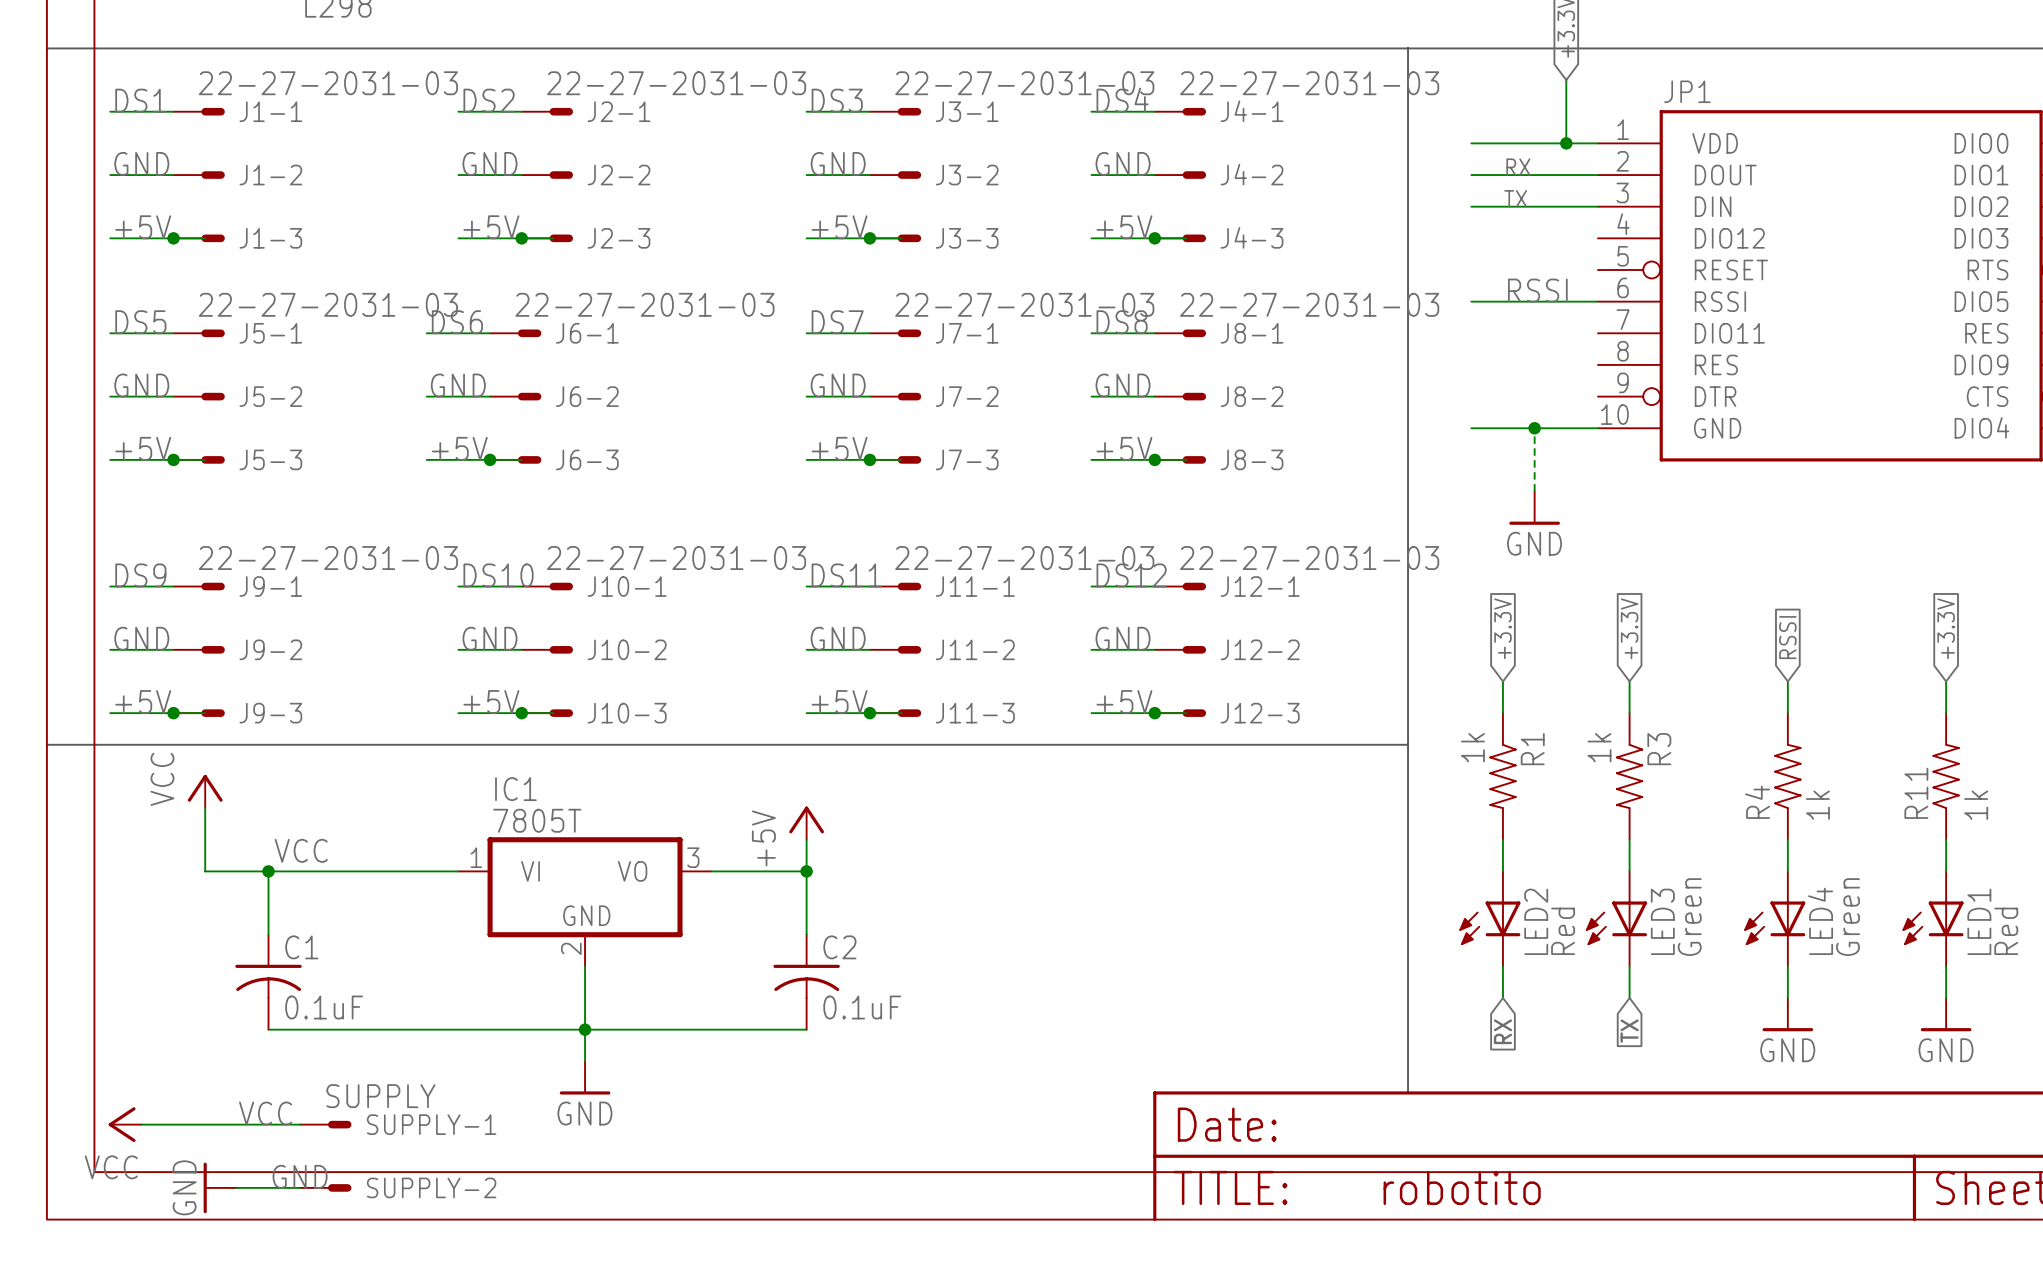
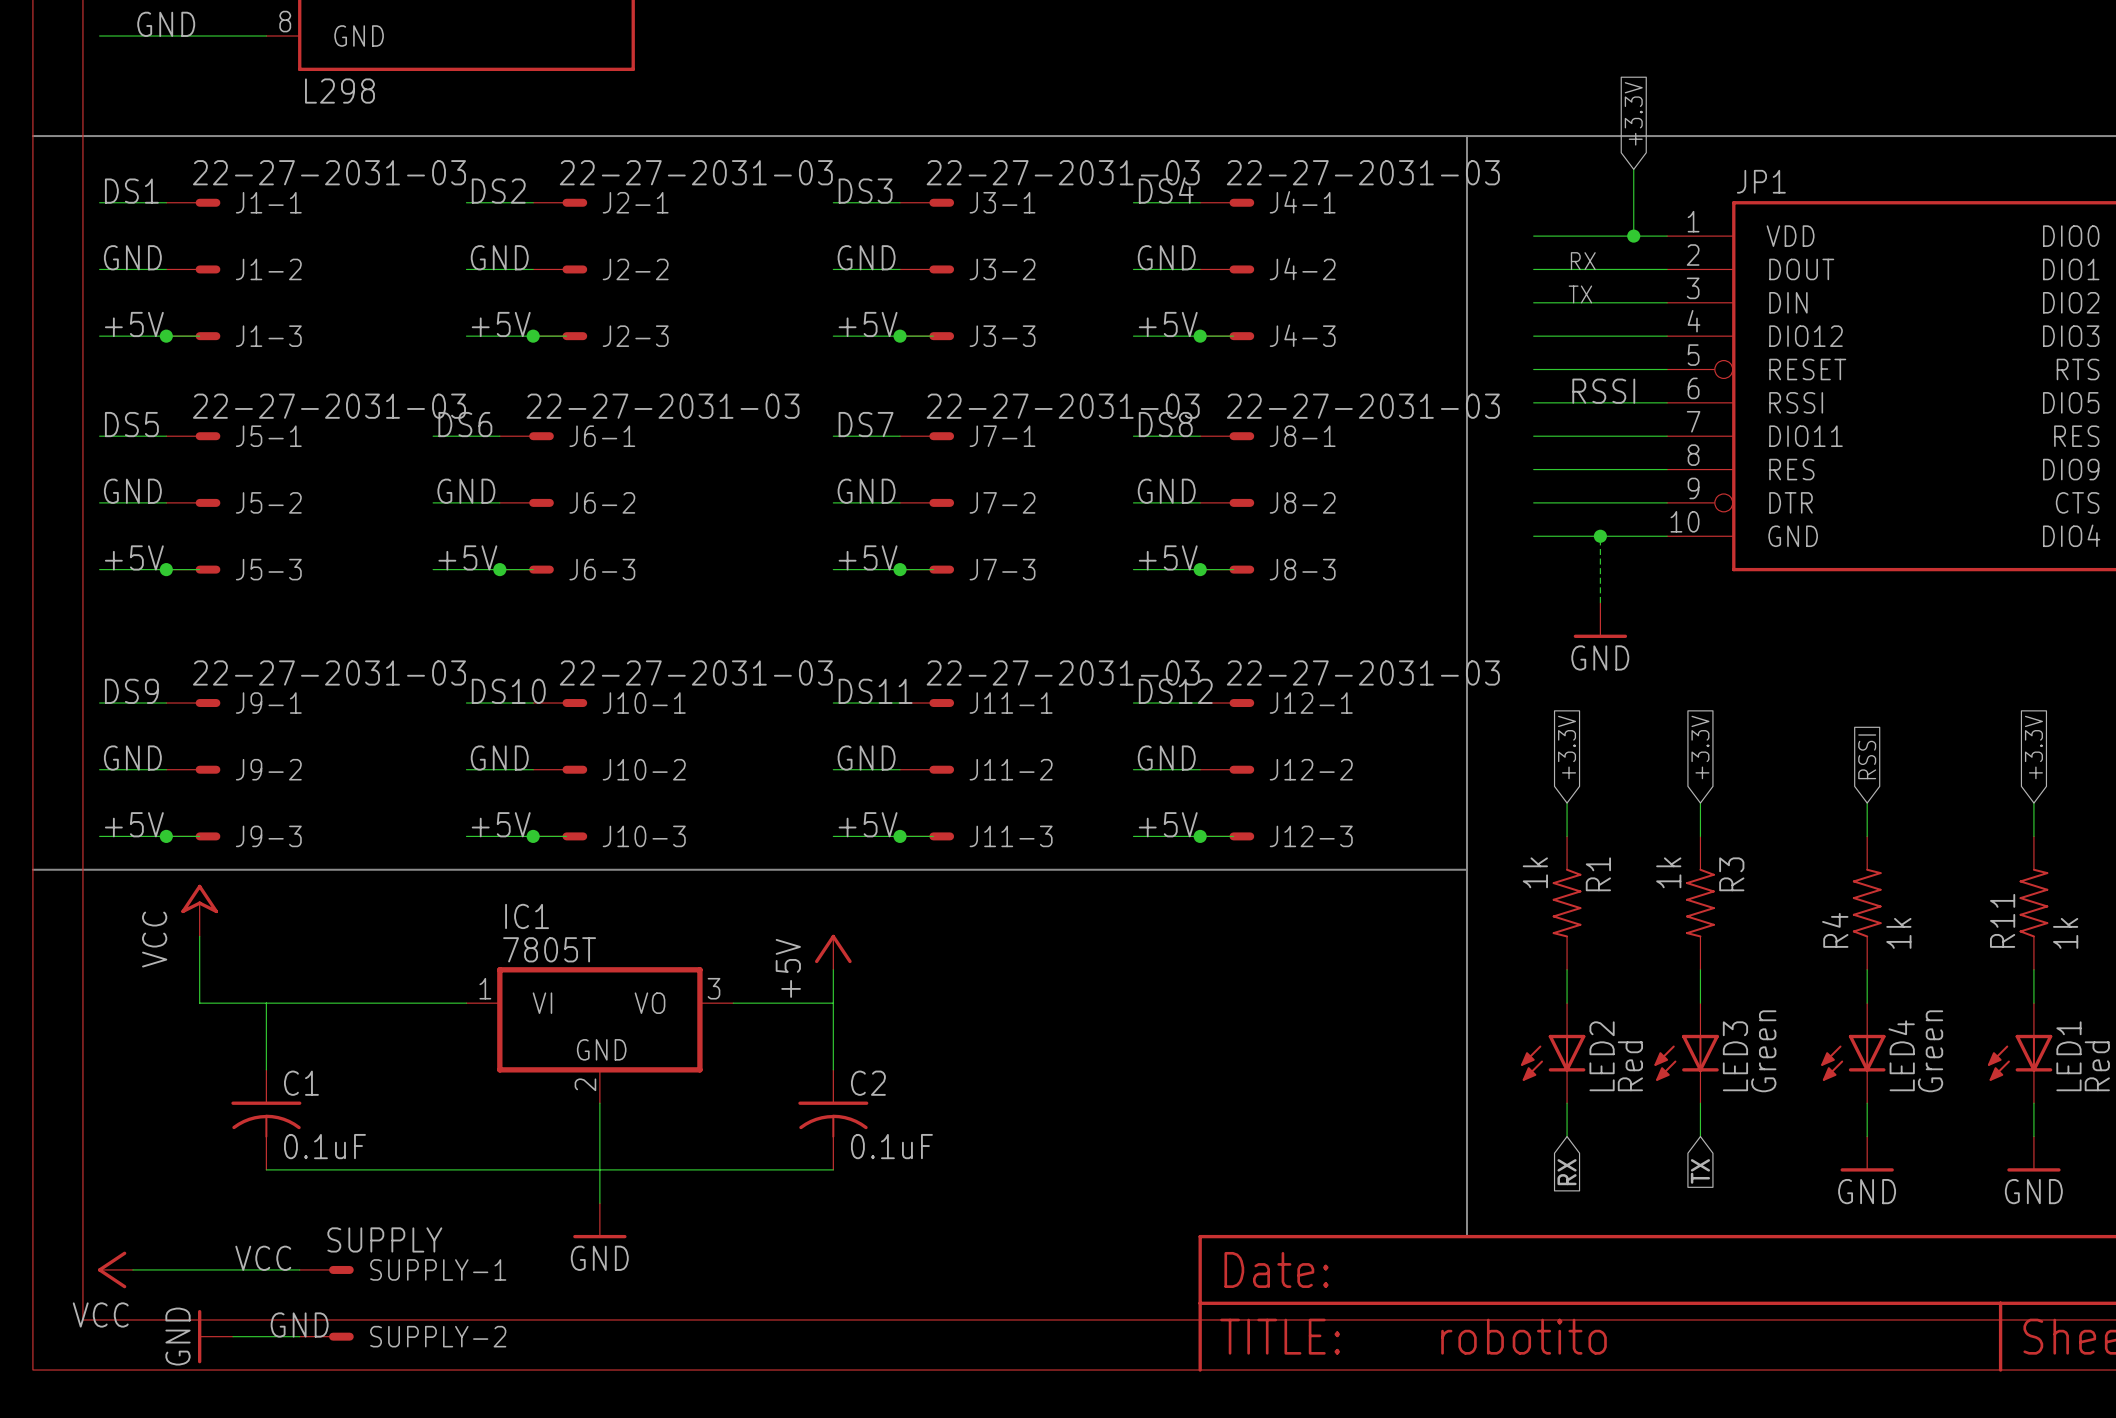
wire: none -> (1533, 336) (1667, 336)
wire: none -> (1533, 369) (1667, 369)
wire: none -> (1533, 436) (1667, 436)
wire: none -> (1533, 469) (1667, 469)
wire: none -> (1533, 502) (1667, 502)
power symbol shape: [187, 774, 223, 809] -> [181, 884, 219, 937]
power symbol text: VCC (162, 779) -> none
label rotation: 0° (301, 850) -> 90° counterclockwise (154, 939)
label position: VCC (301, 850) -> VCC (154, 939)
junction: (268, 871) -> none
junction: (806, 871) -> none
junction: (585, 1029) -> none

